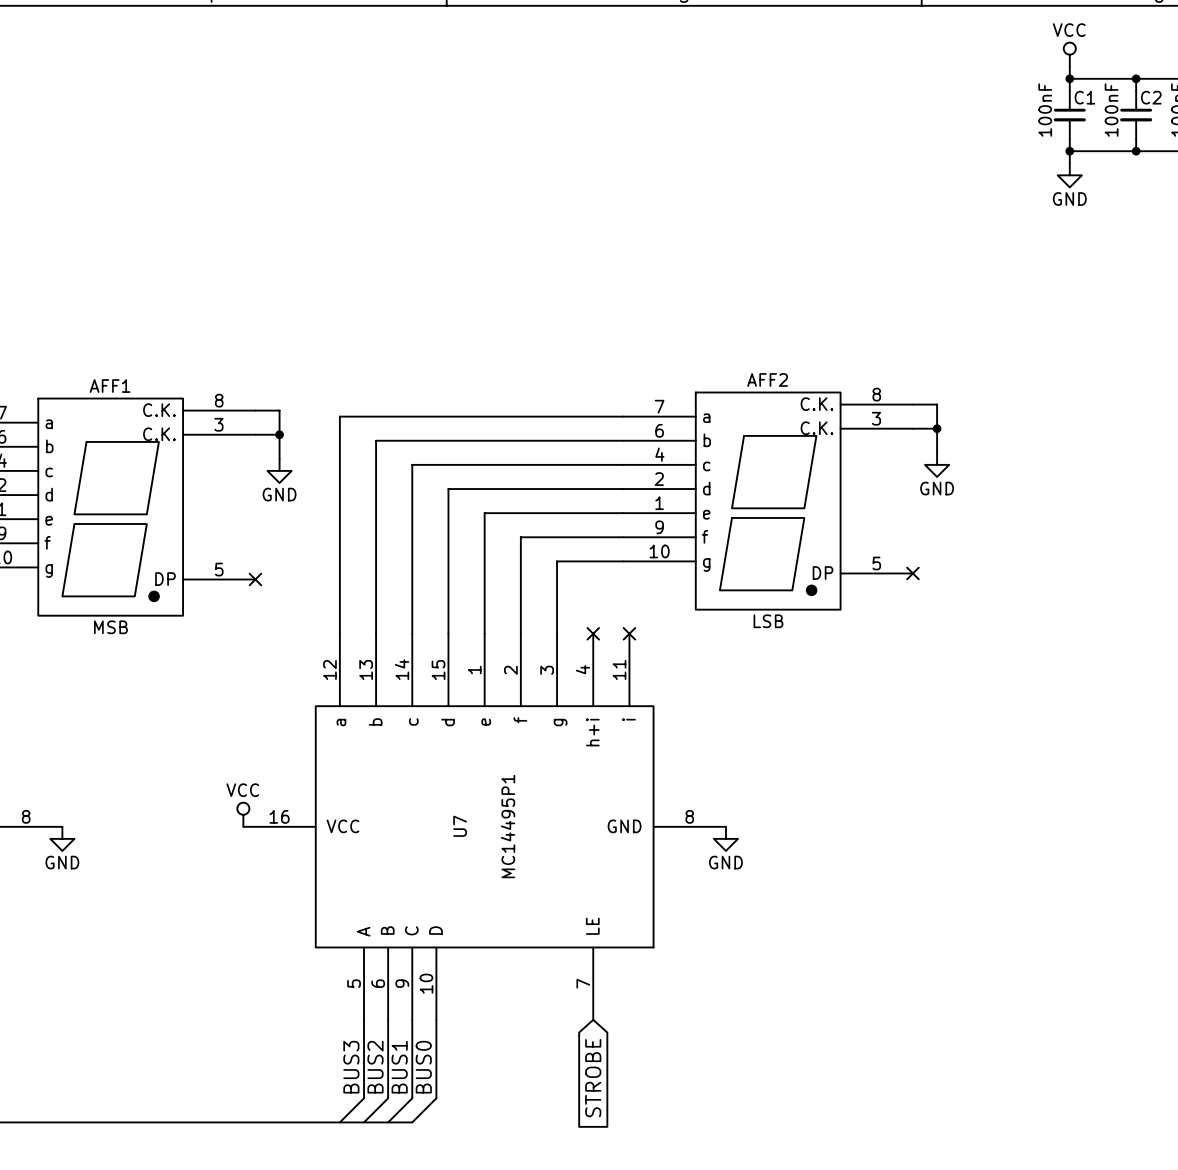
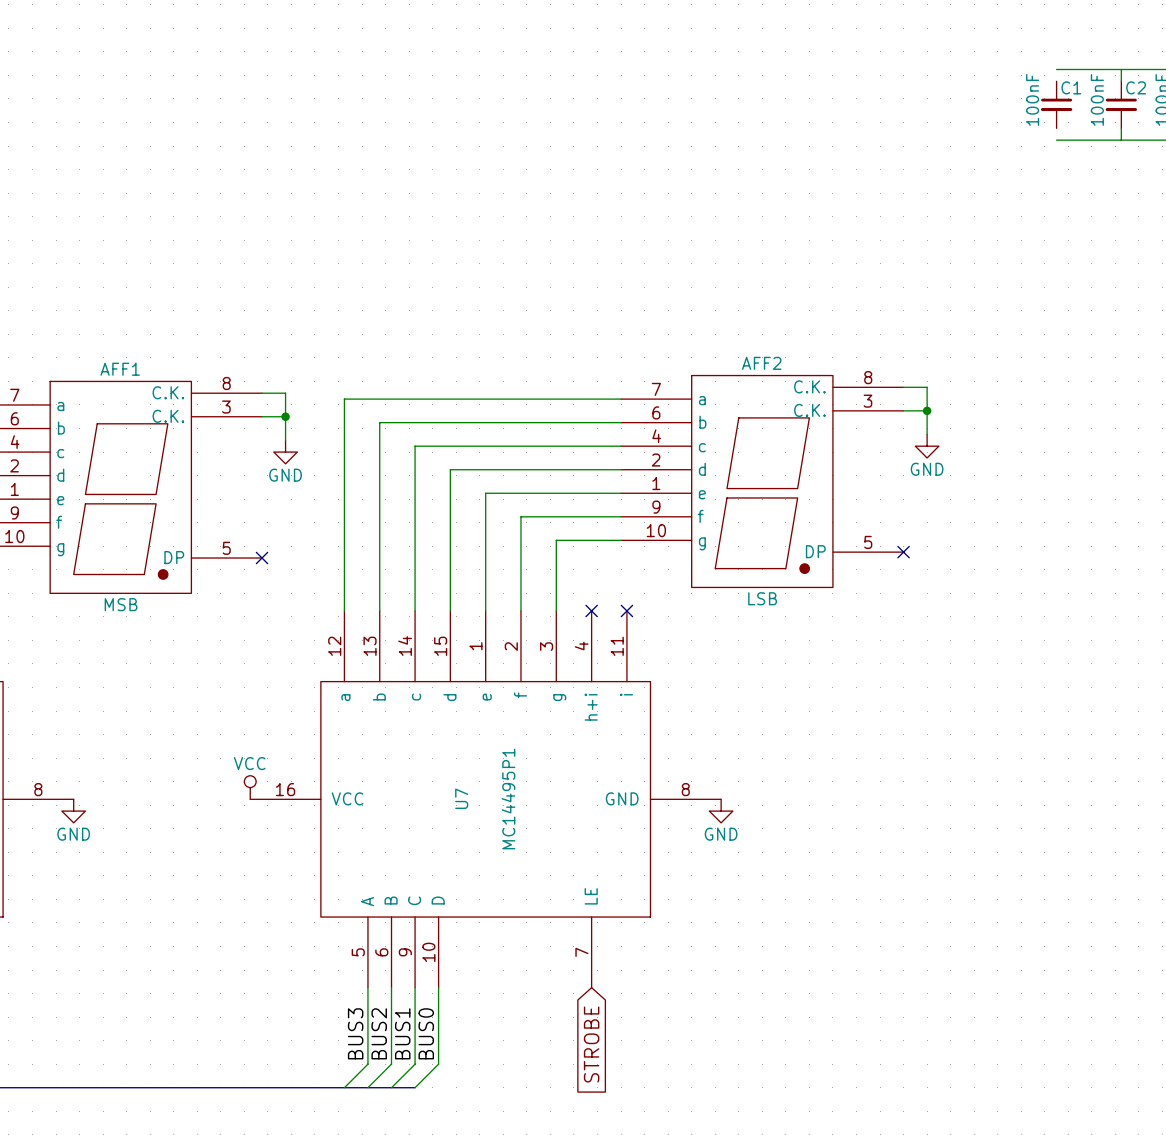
power symbol: VCC (1069, 54) -> none
wire: (1069, 66) (1069, 90) -> none
junction: (1069, 78) -> none
junction: (1136, 78) -> none
wire: (1069, 139) (1069, 163) -> none
junction: (1069, 151) -> none
junction: (1136, 151) -> none
power symbol: GND (1069, 175) -> none

